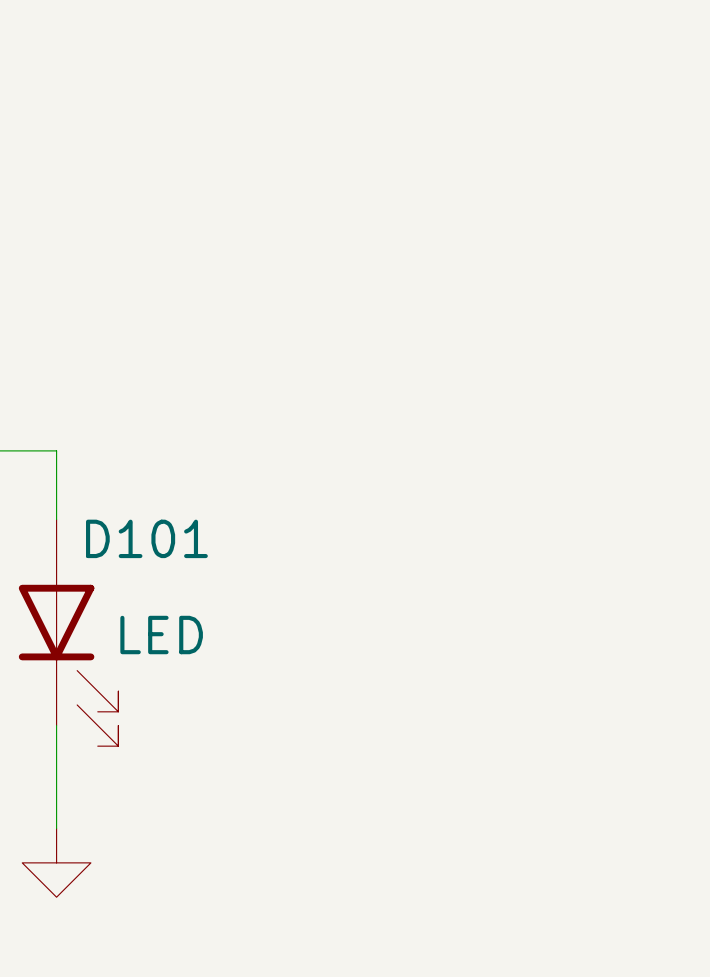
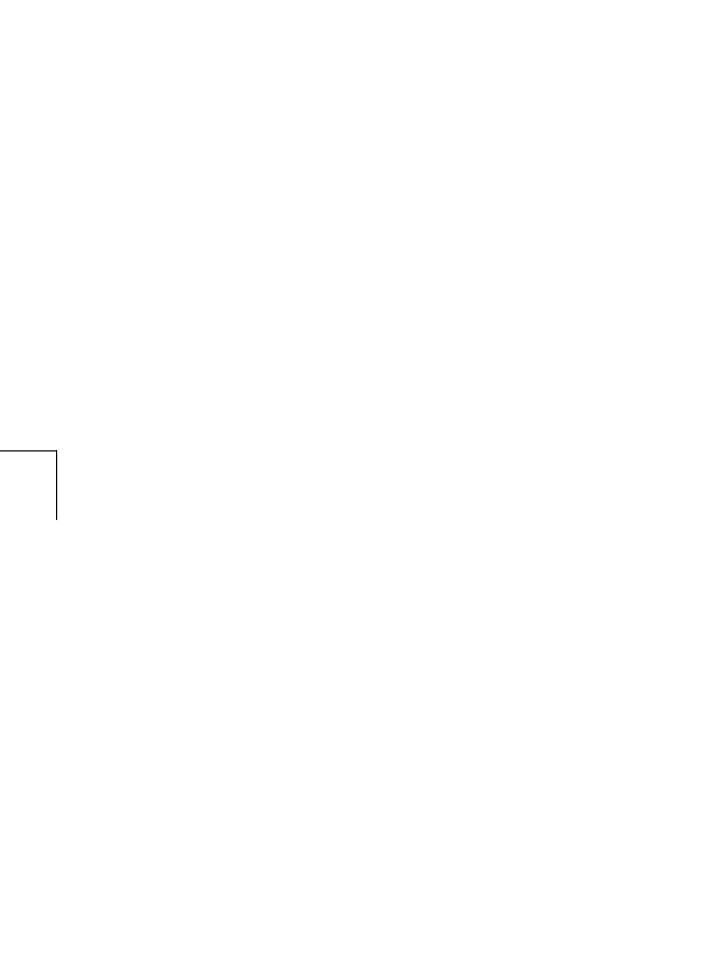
D101: LED (68, 632) -> none
wire: (56, 725) (56, 828) -> none
power symbol: (56, 862) -> none

